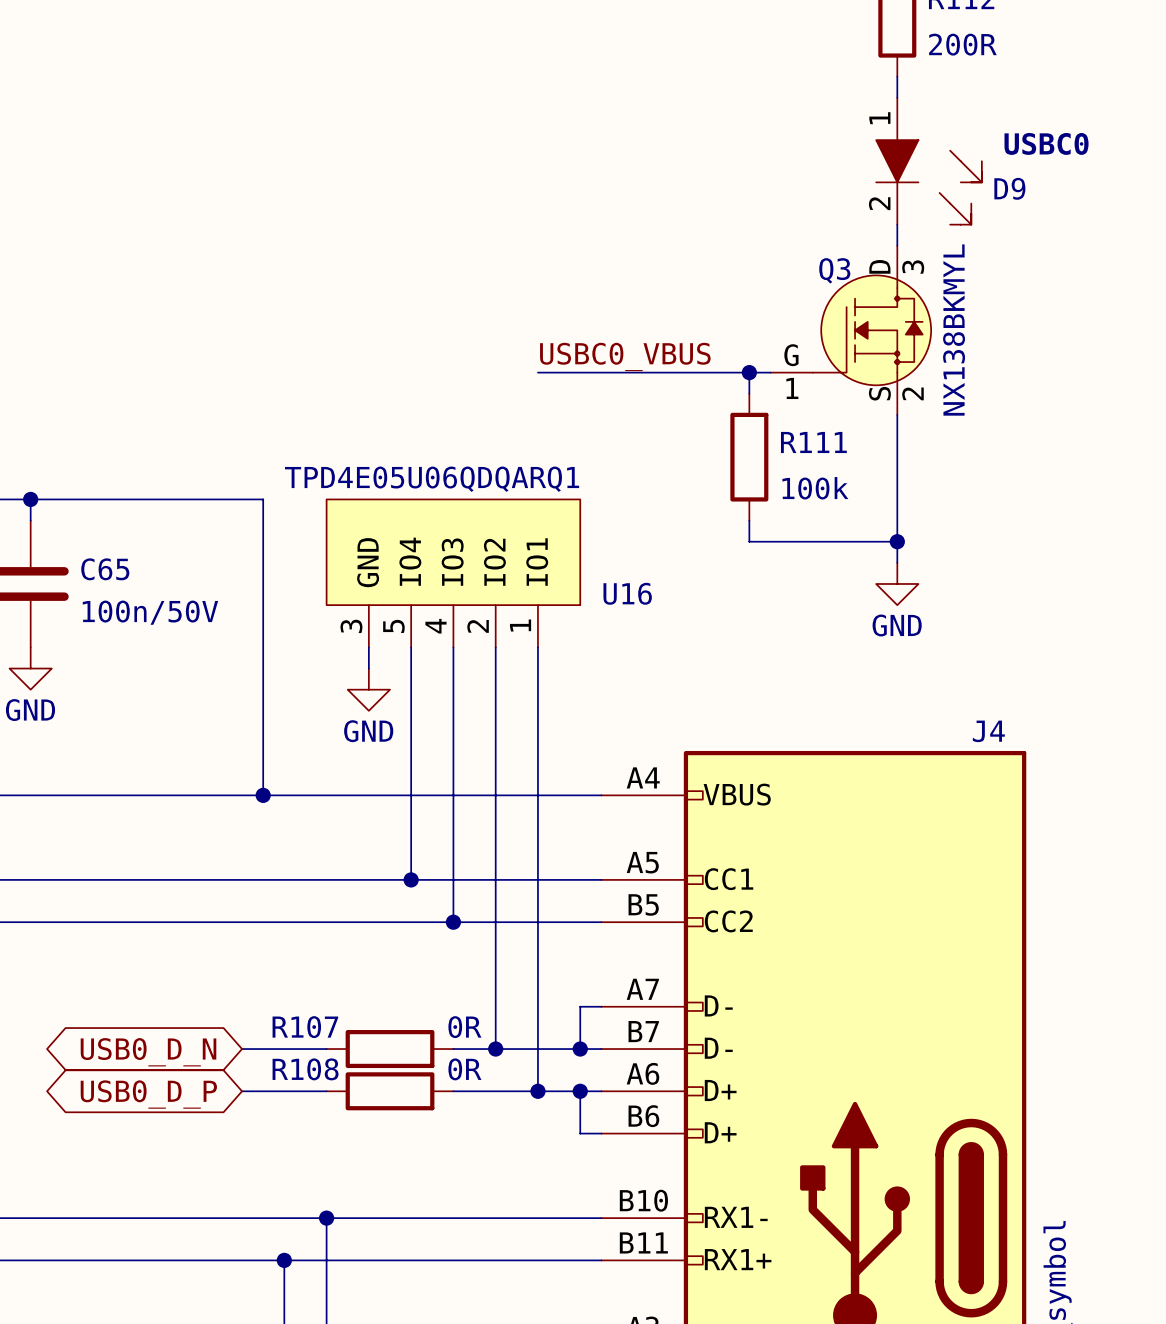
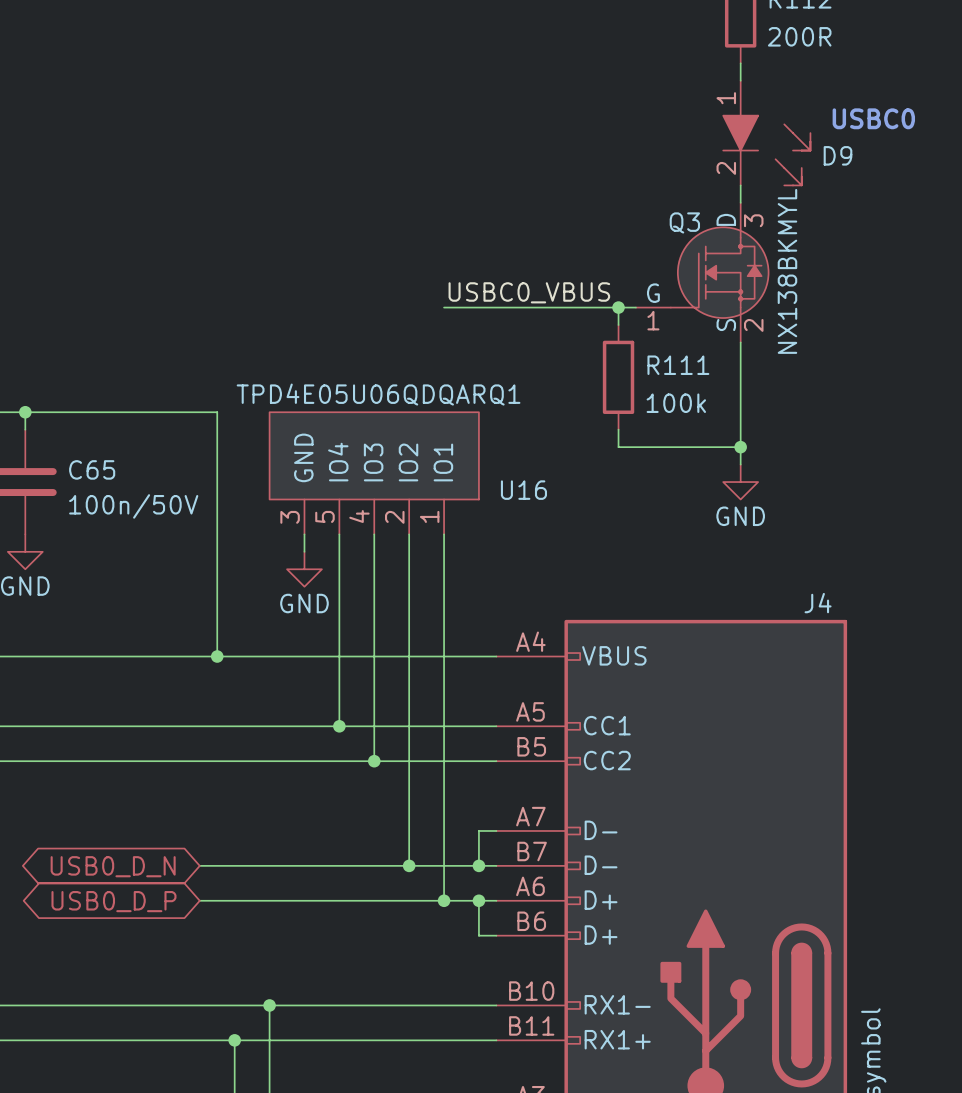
wire: none -> (269, 865) (374, 865)
R107: (390, 1049) -> none
wire: none -> (269, 900) (374, 900)
R108: (390, 1091) -> none

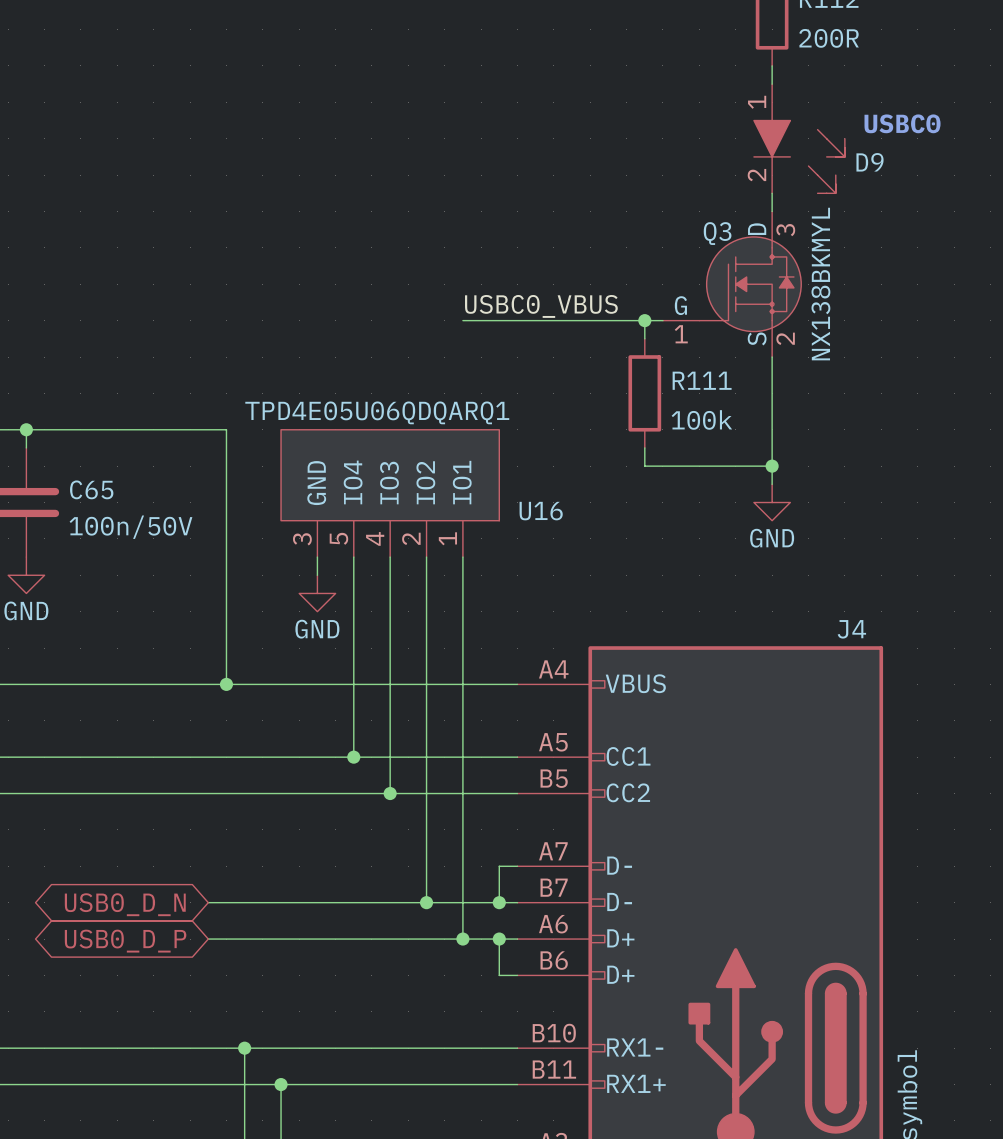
junction: none -> (244, 1048)
wire: (269, 1005) (269, 1040) -> (244, 1048) (244, 1084)
junction: (269, 1005) -> none
junction: (234, 1040) -> none
junction: none -> (281, 1084)

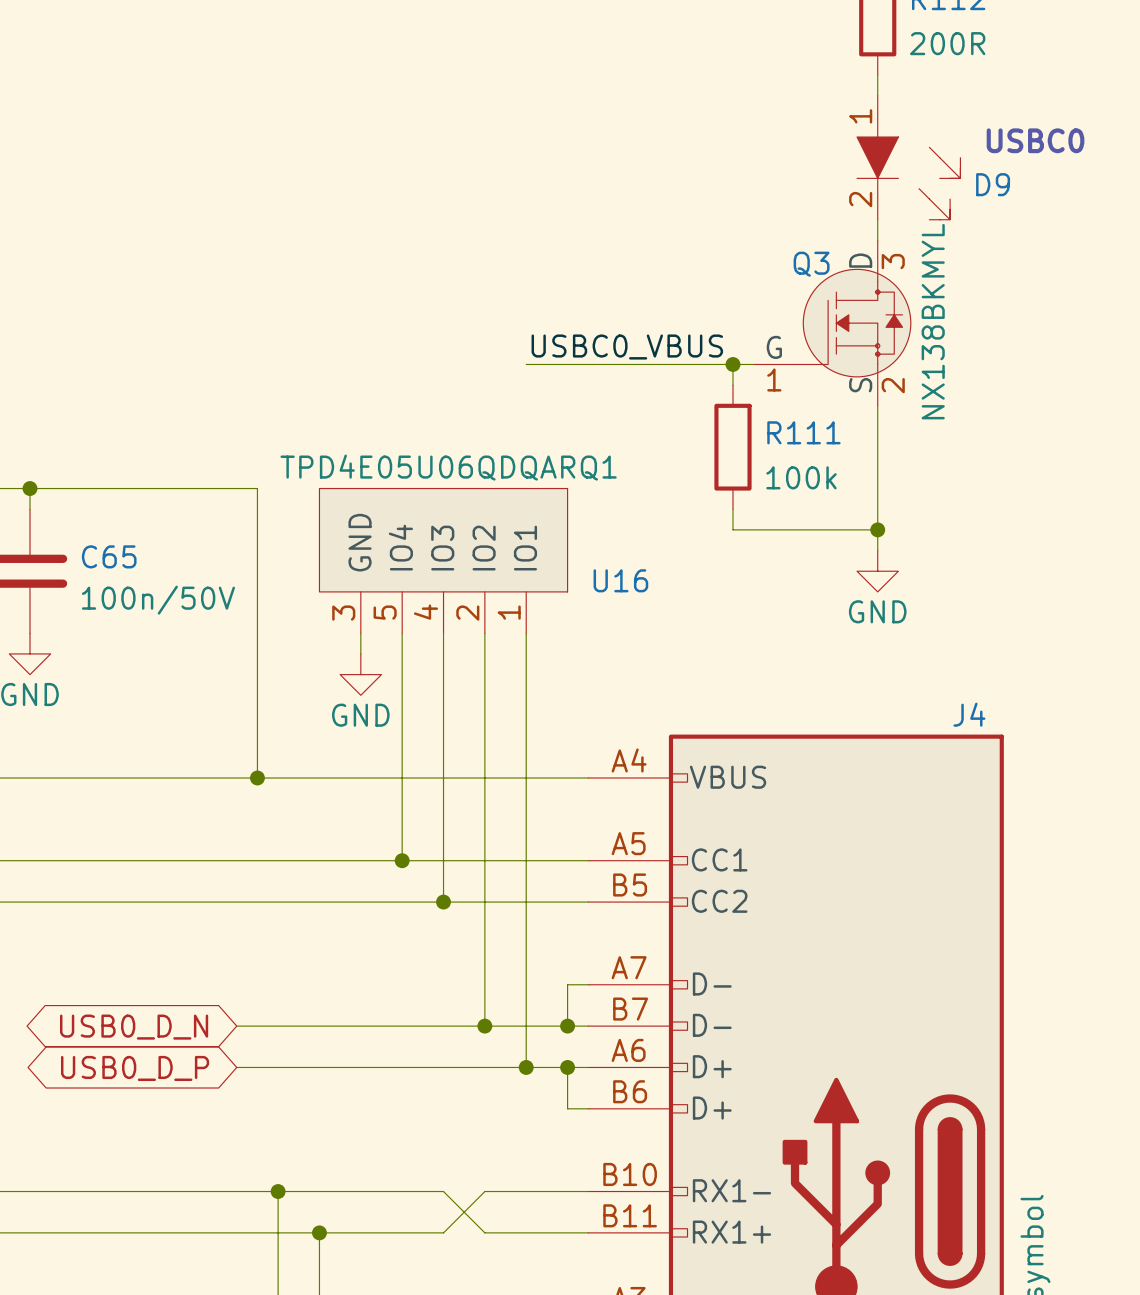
wire: (390, 1048) (426, 1048) -> (443, 1191) (484, 1232)
wire: (390, 1084) (426, 1084) -> (443, 1232) (484, 1191)

